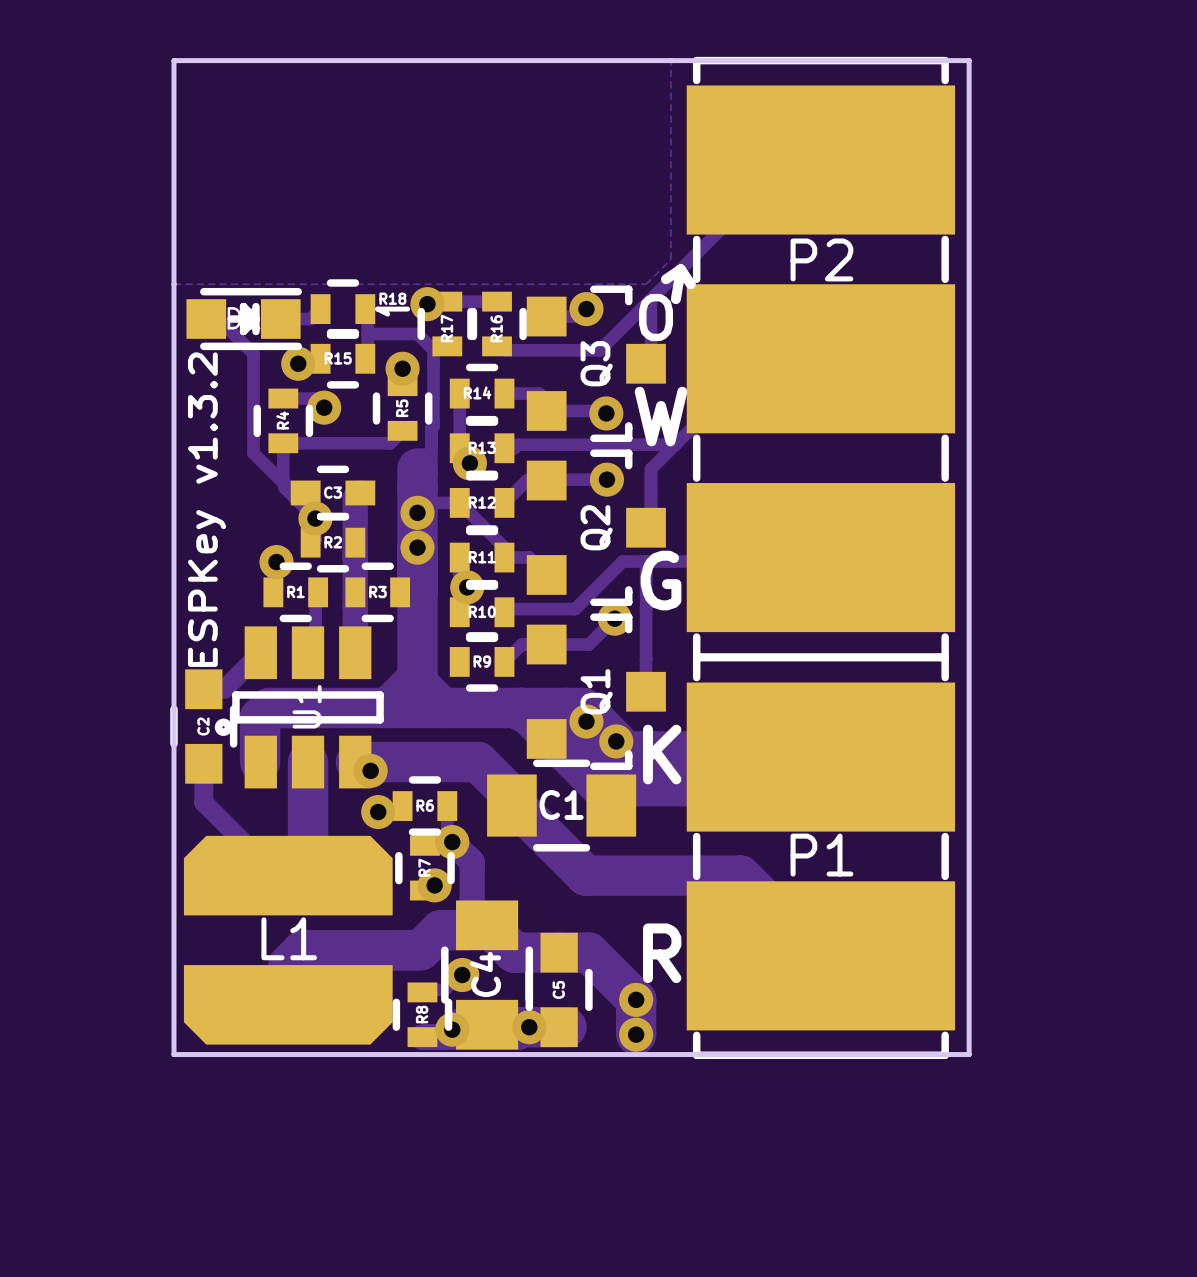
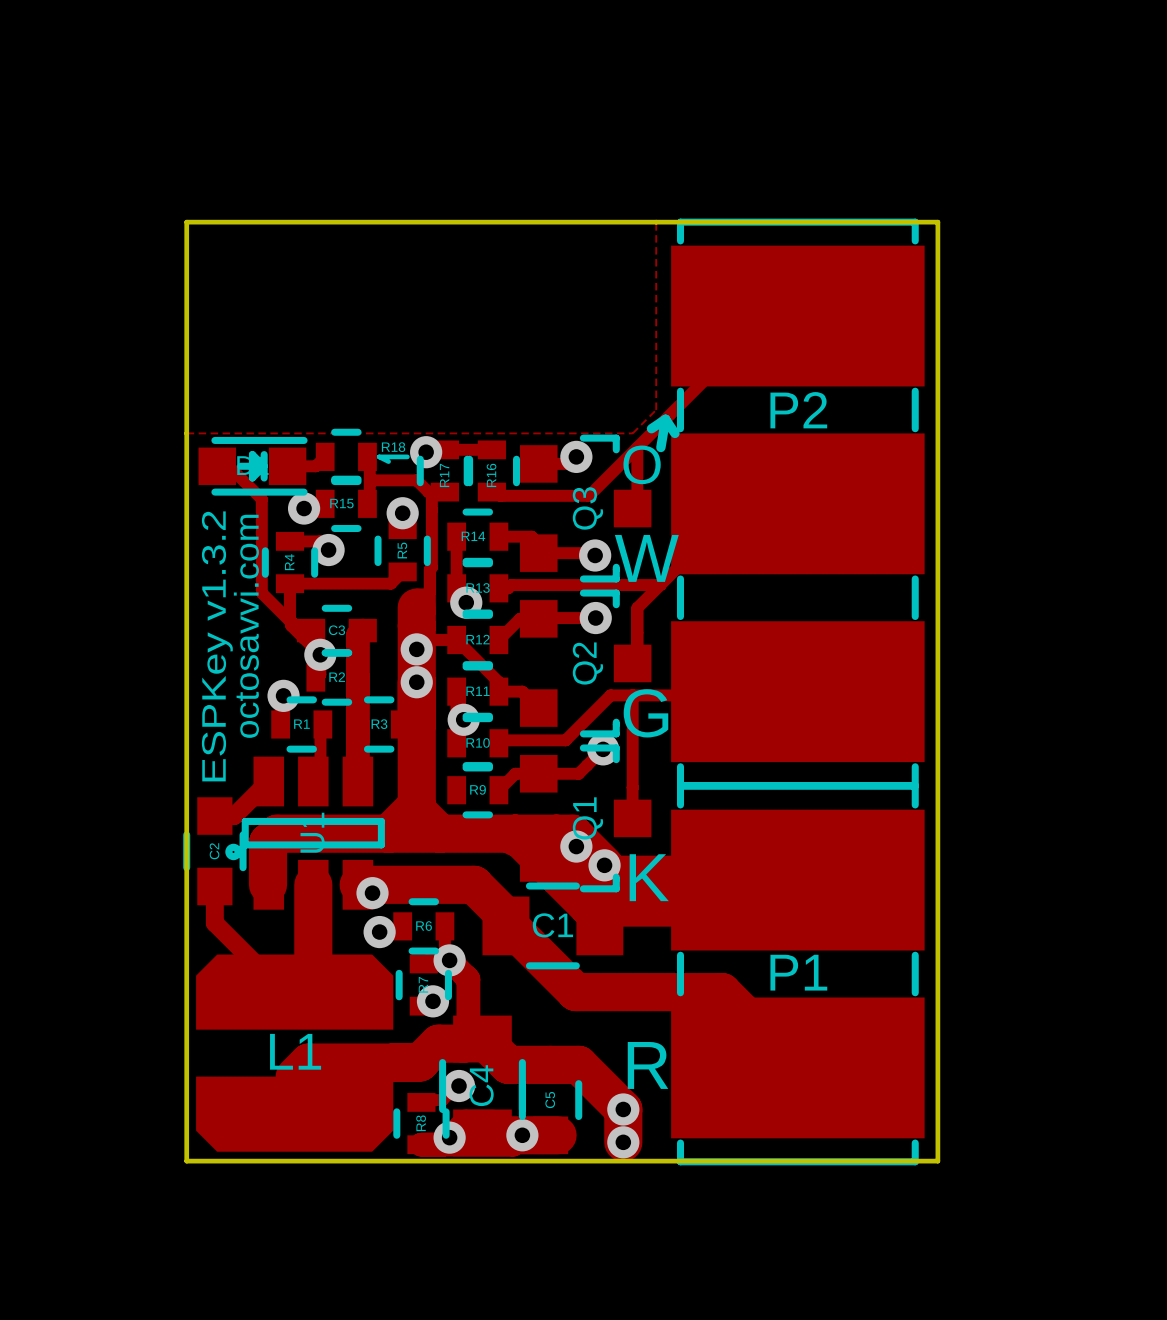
text: none -> octosavvi.com (246, 626)

